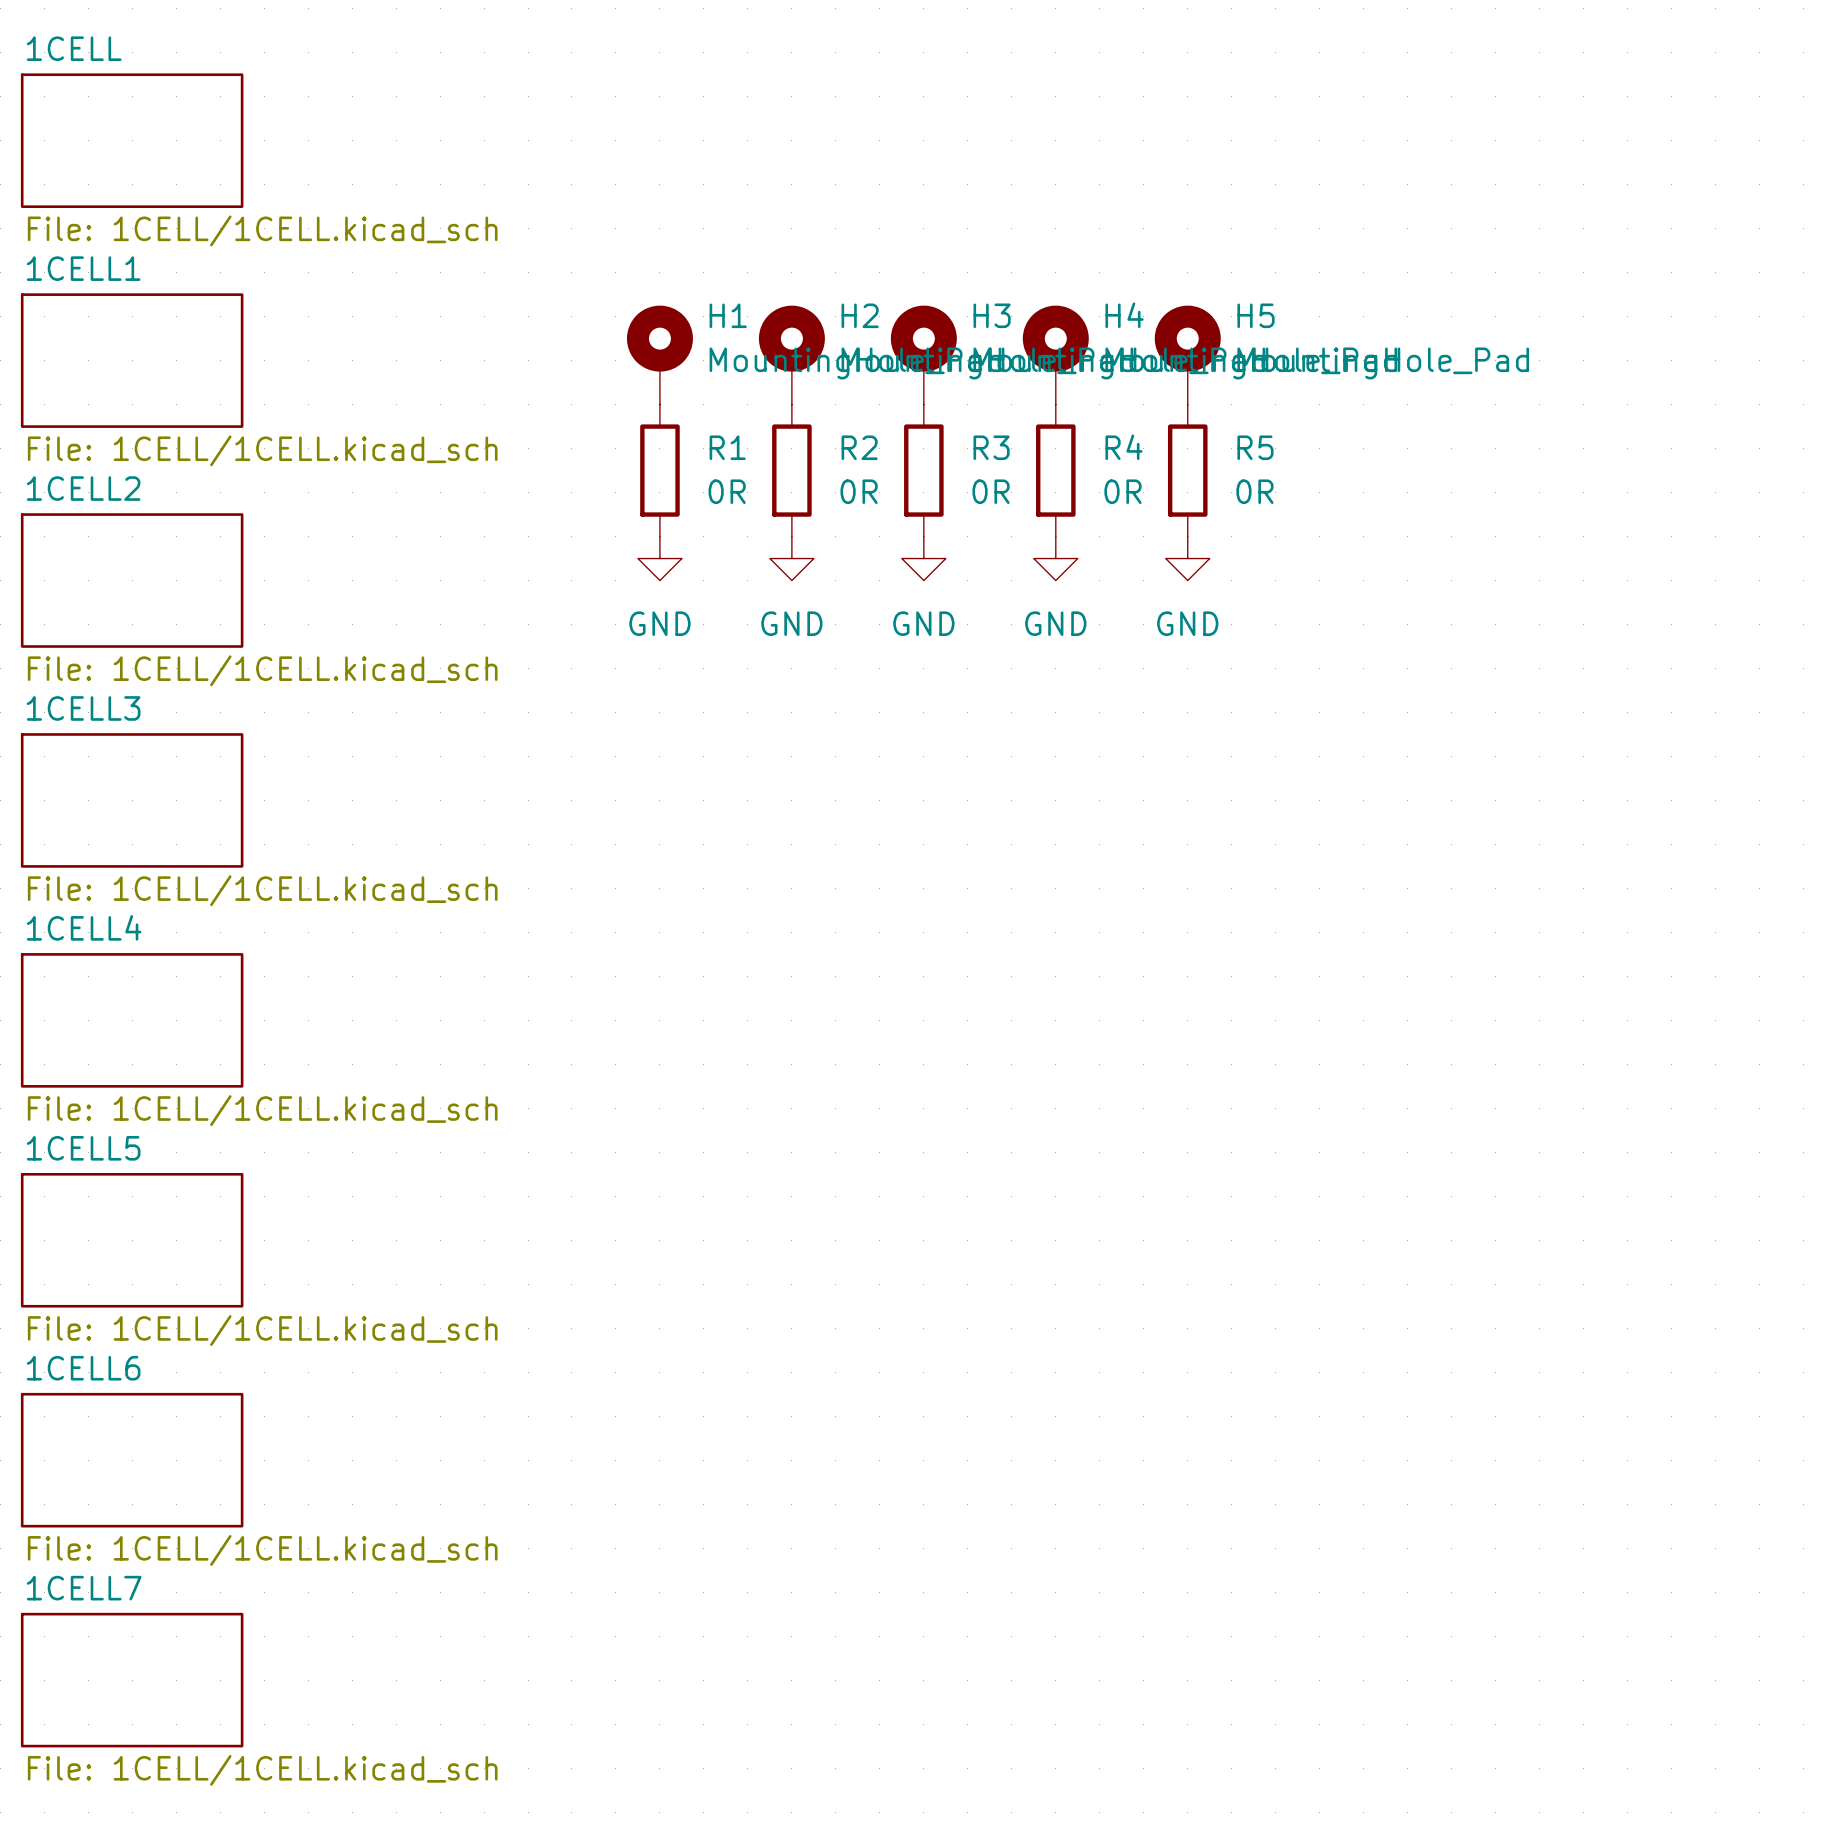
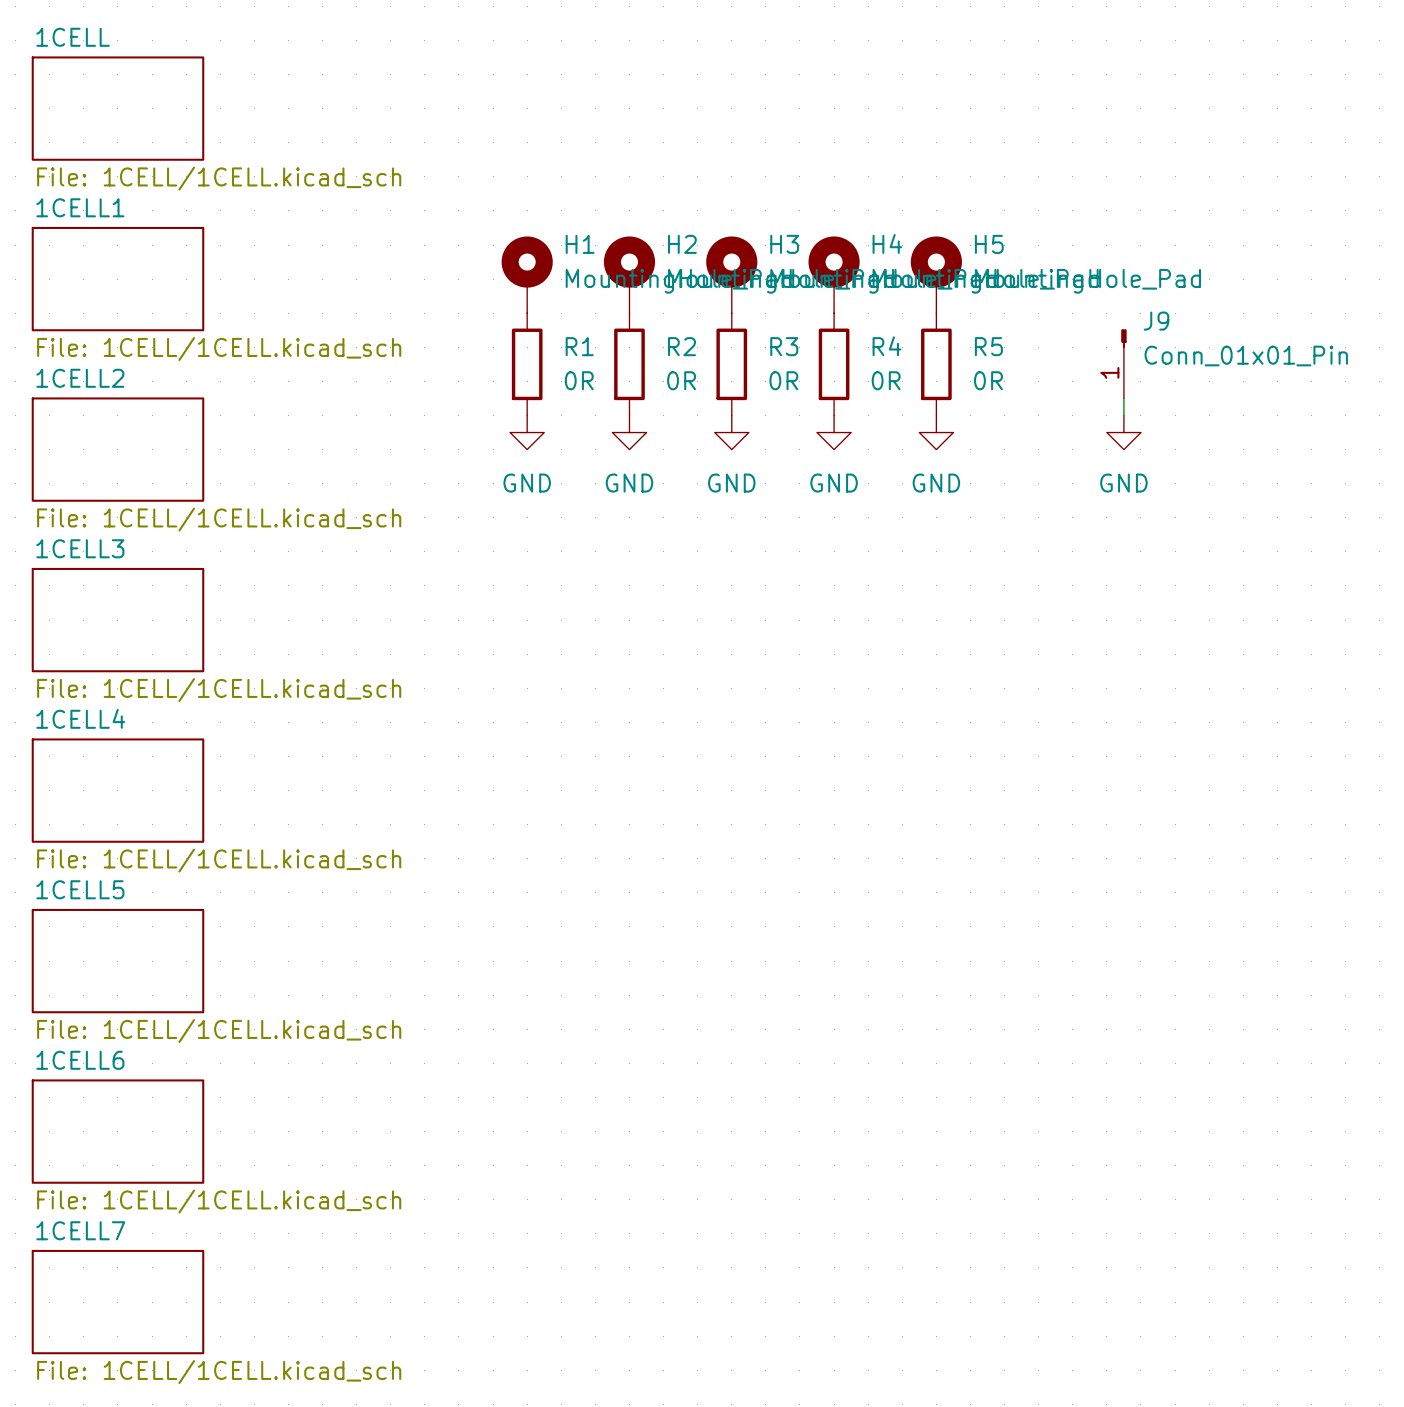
J9: none -> Conn_01x01_Pin (1123, 363)
wire: none -> (1123, 398) (1123, 415)
power symbol: none -> GND (1123, 432)

